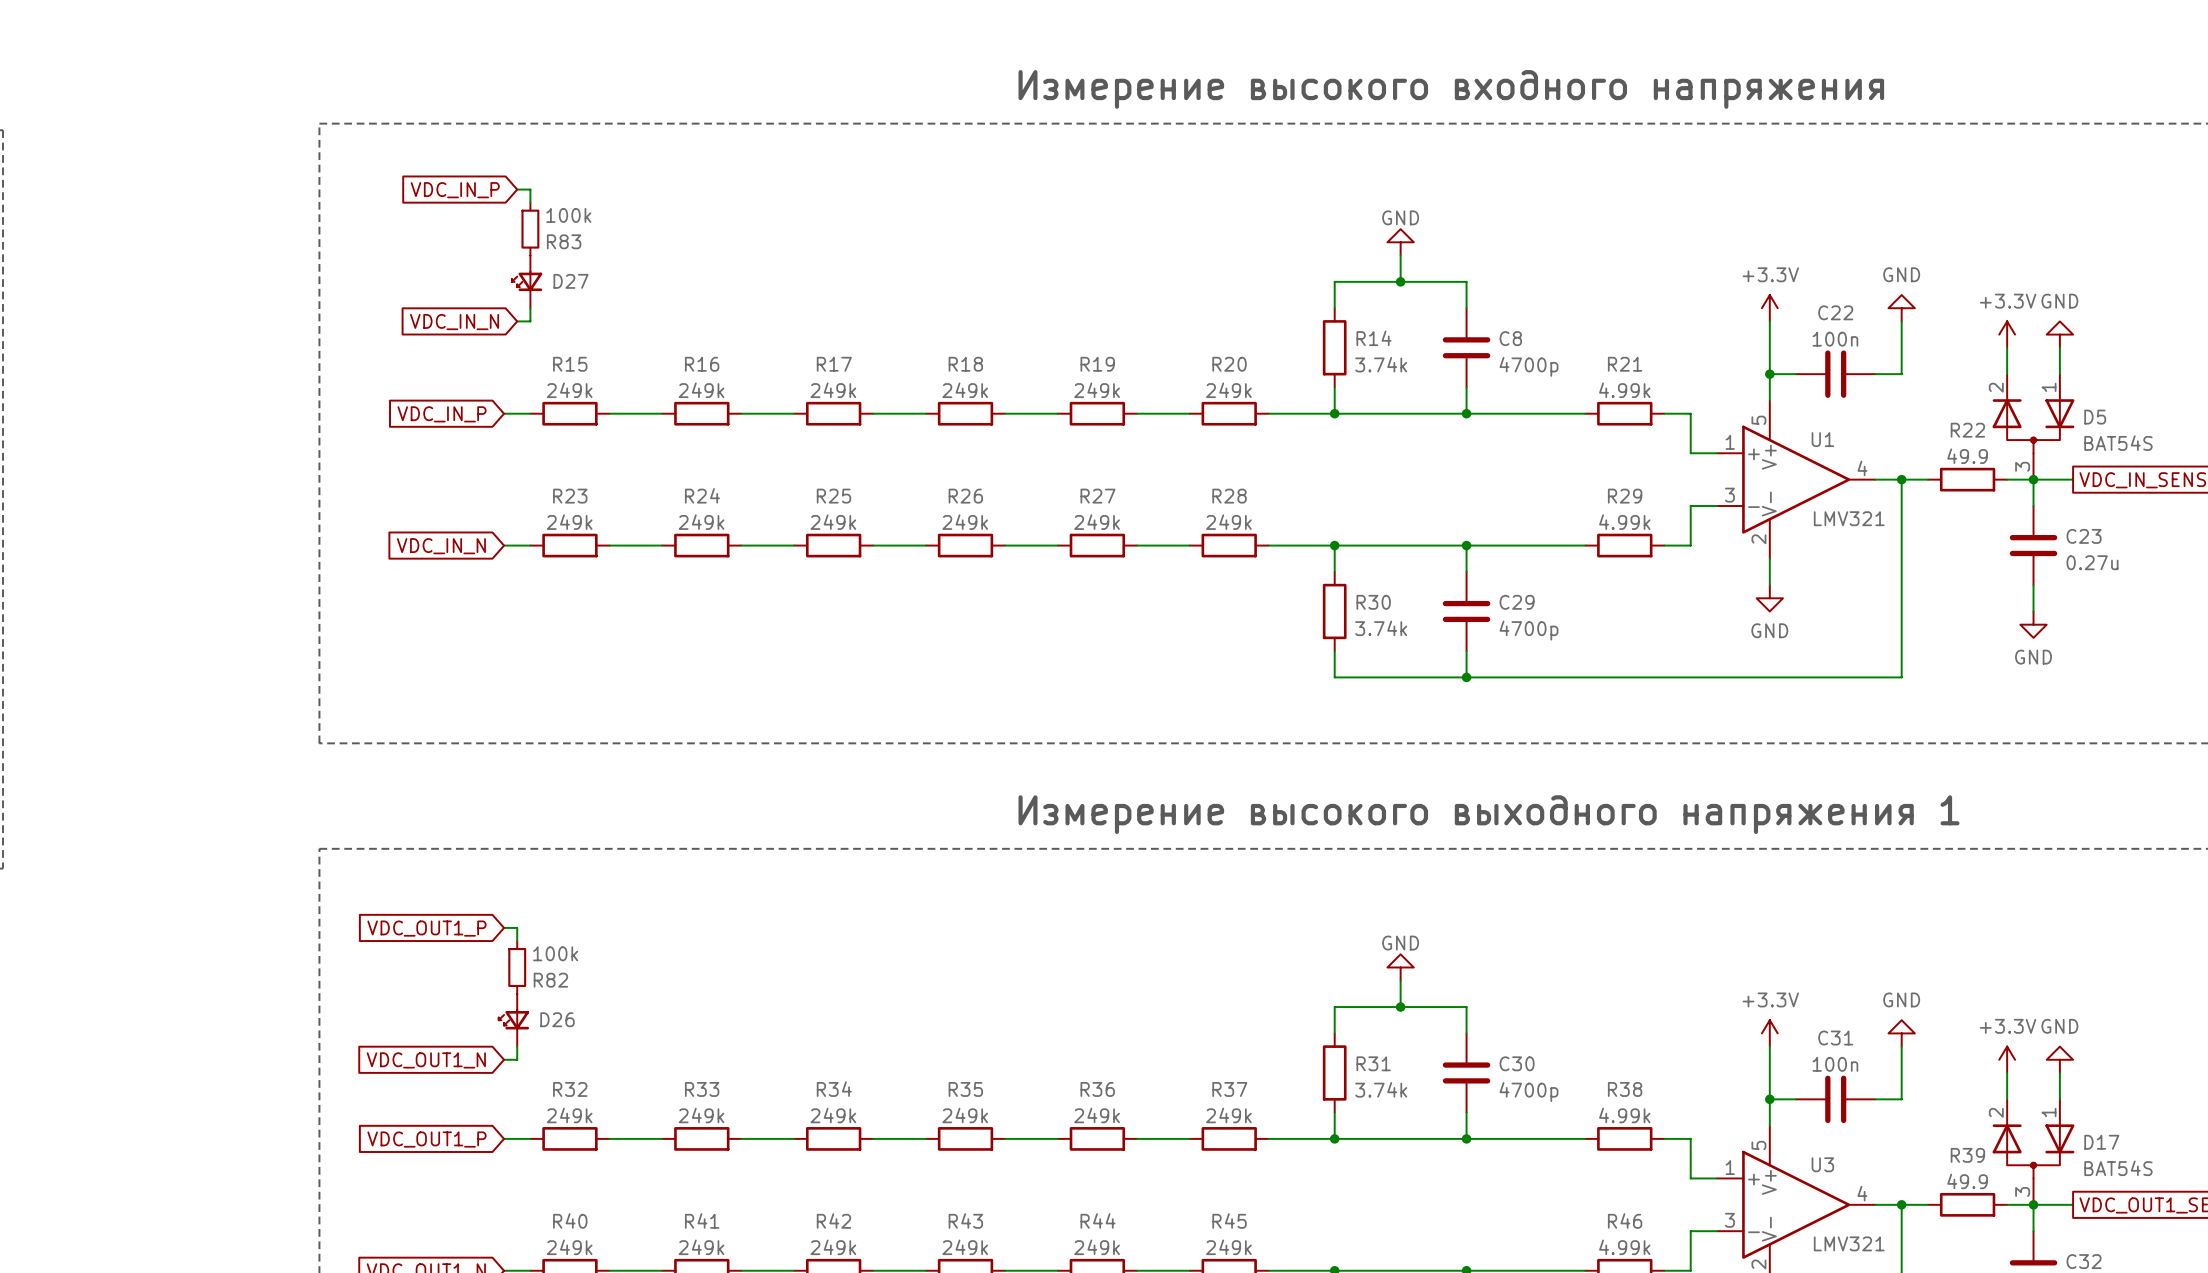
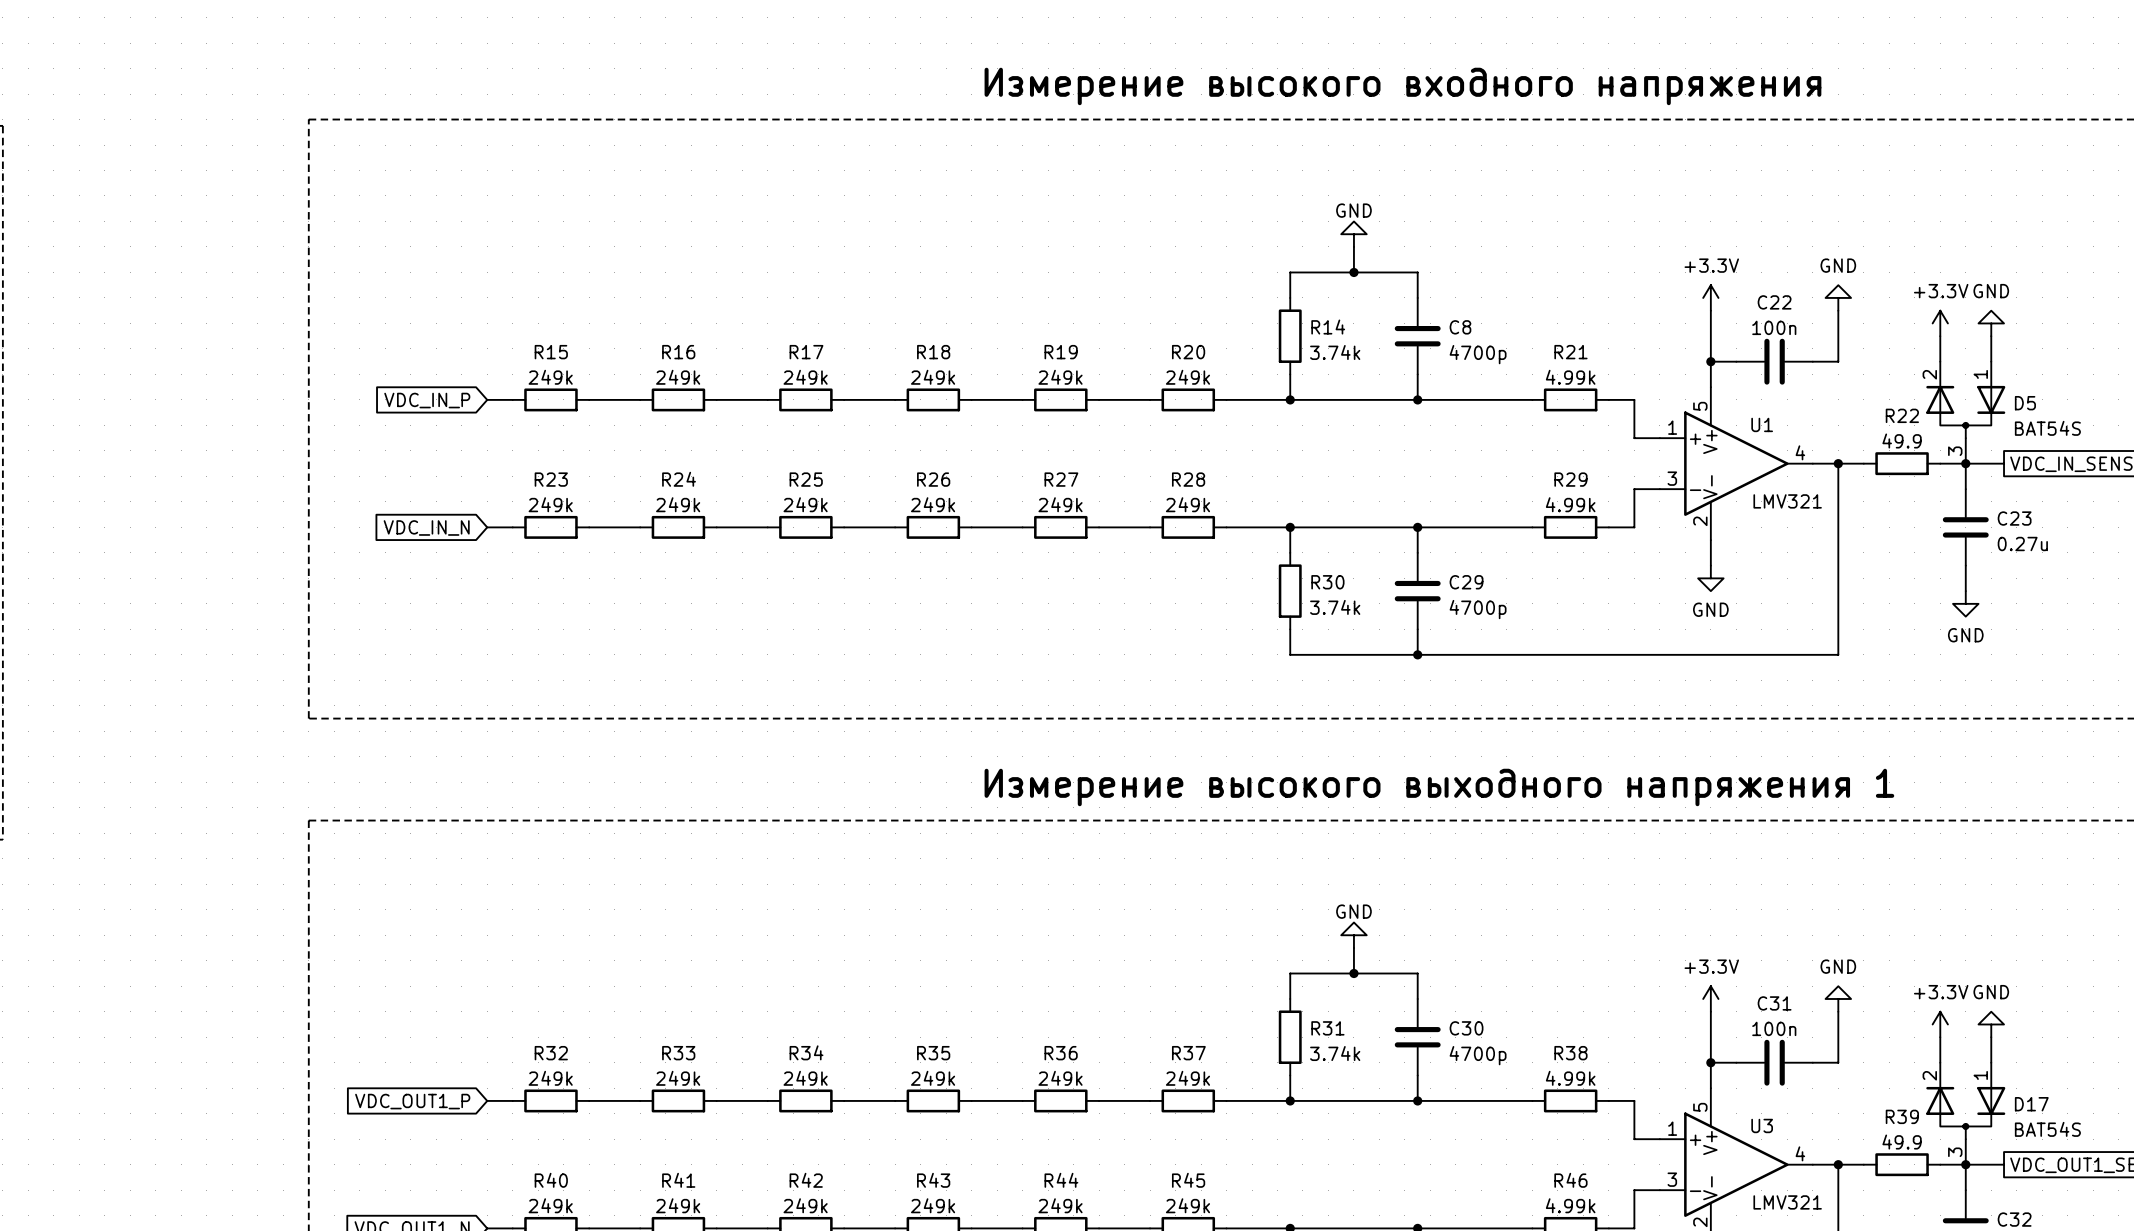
wire: (517, 189) (530, 189) (530, 202) -> none
global label: VDC_IN_P (455, 190) -> none
R83: 100k (530, 229) -> none
D27: (527, 281) -> none
wire: (530, 308) (530, 321) (517, 321) -> none
global label: VDC_IN_N (454, 322) -> none
wire: (504, 927) (517, 927) (517, 941) -> none
global label: VDC_OUT1_P (426, 928) -> none
R82: 100k (517, 967) -> none
D26: (513, 1020) -> none
wire: (517, 1046) (517, 1059) (504, 1059) -> none
global label: VDC_OUT1_N (426, 1060) -> none

